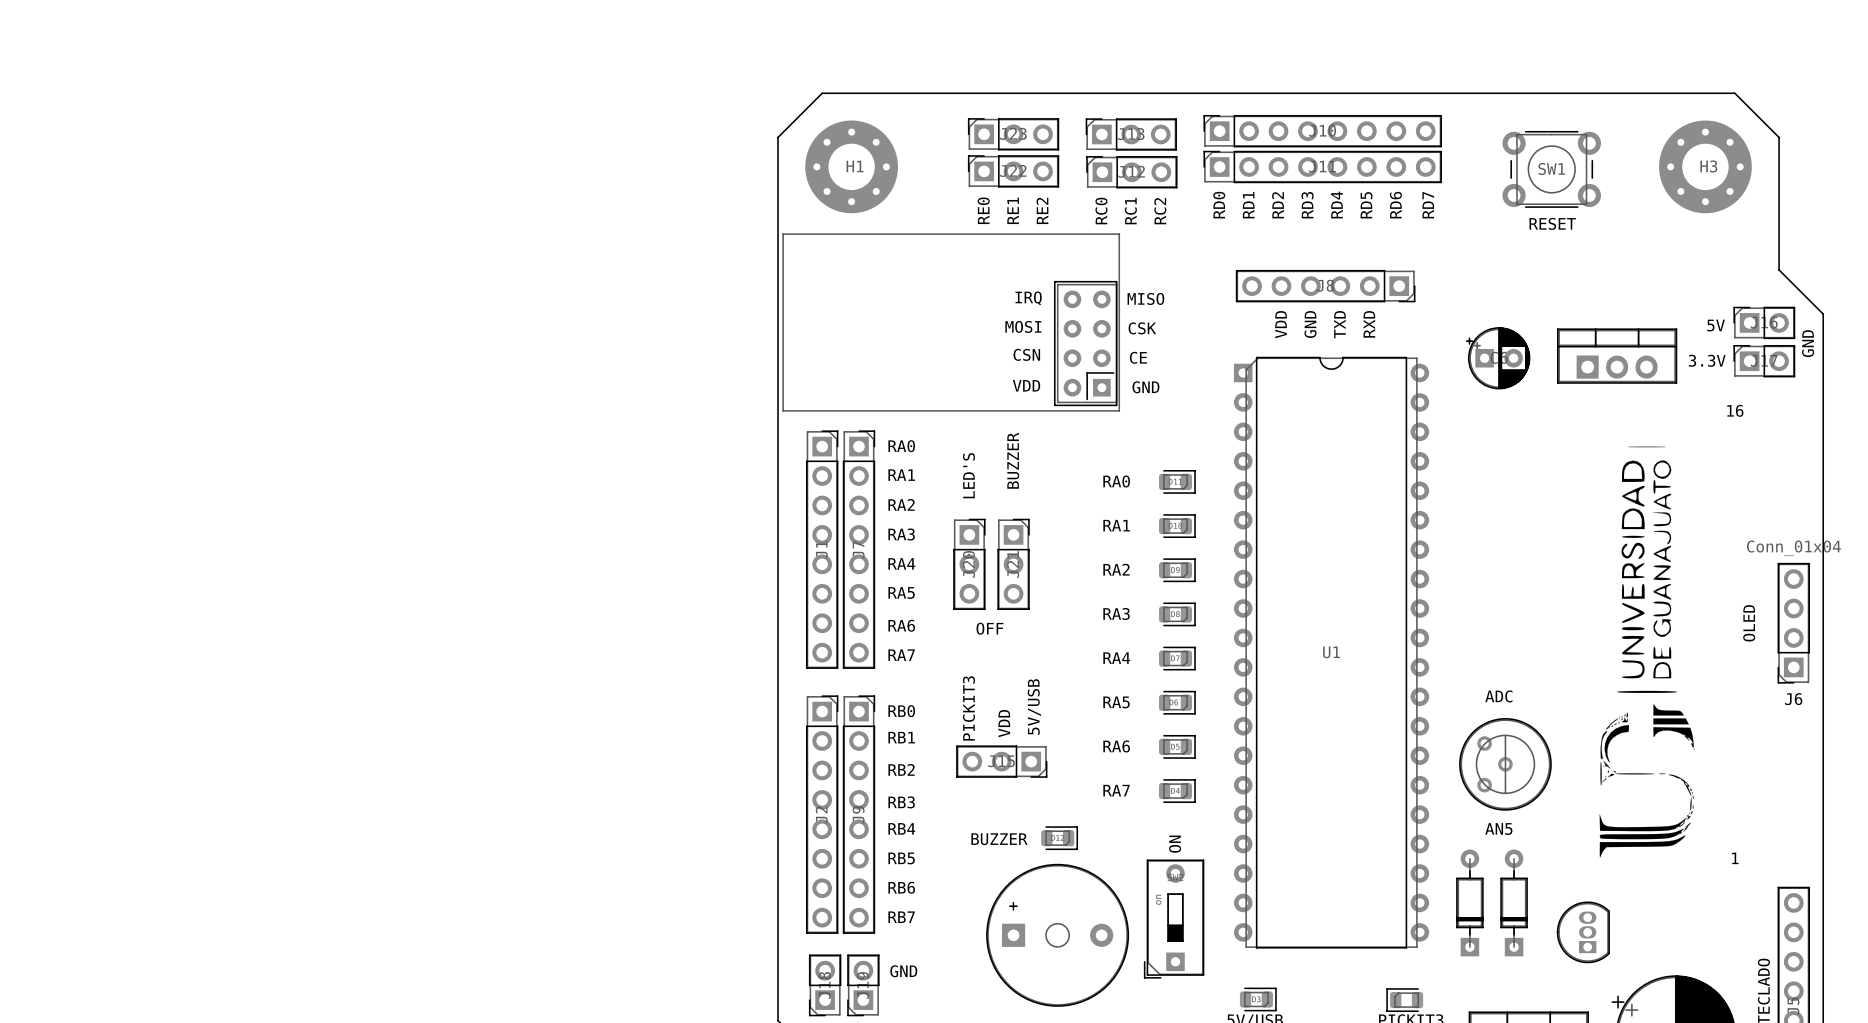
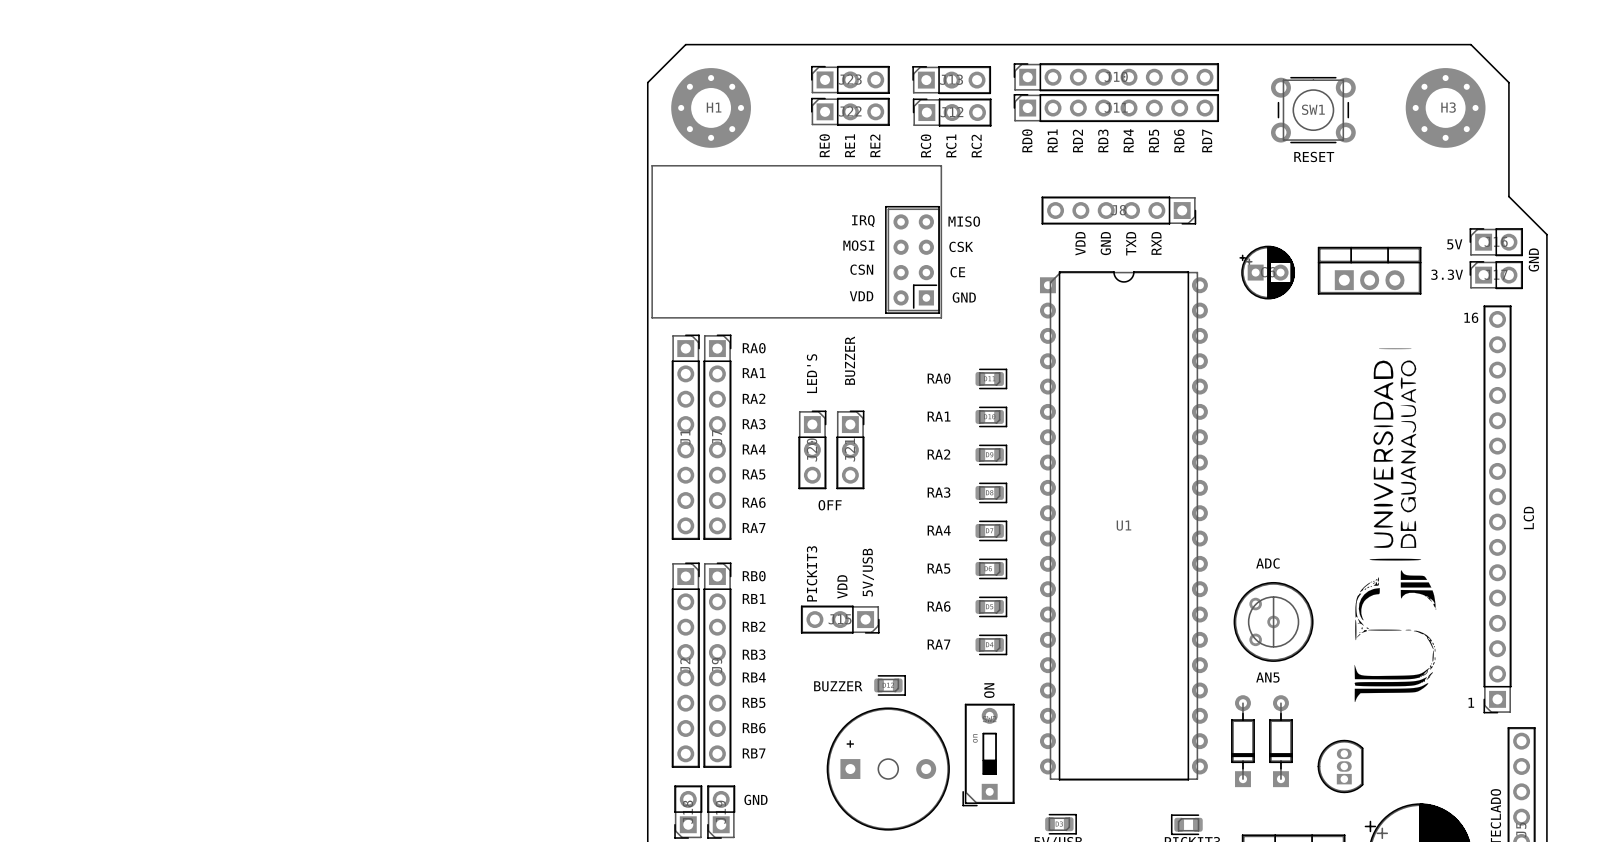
text: OLED (1749, 623) -> none
J6: Conn_01x04 (1793, 623) -> none
part: none -> (1497, 509)
text: none -> LCD (1528, 517)

